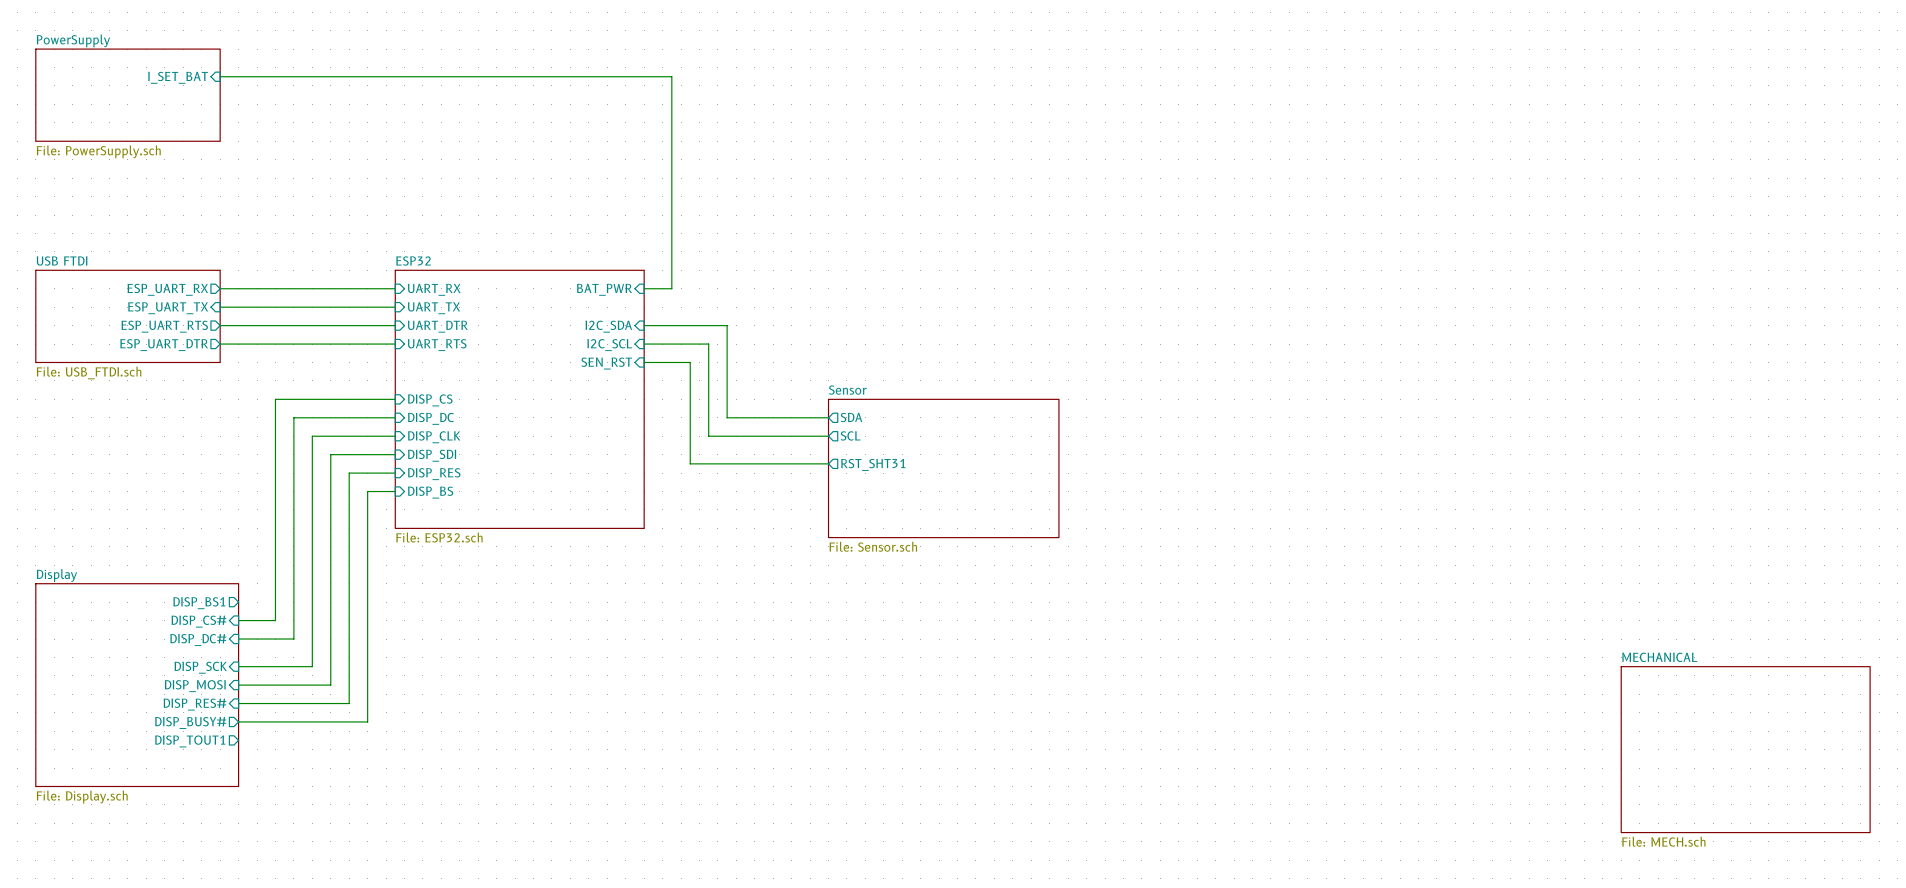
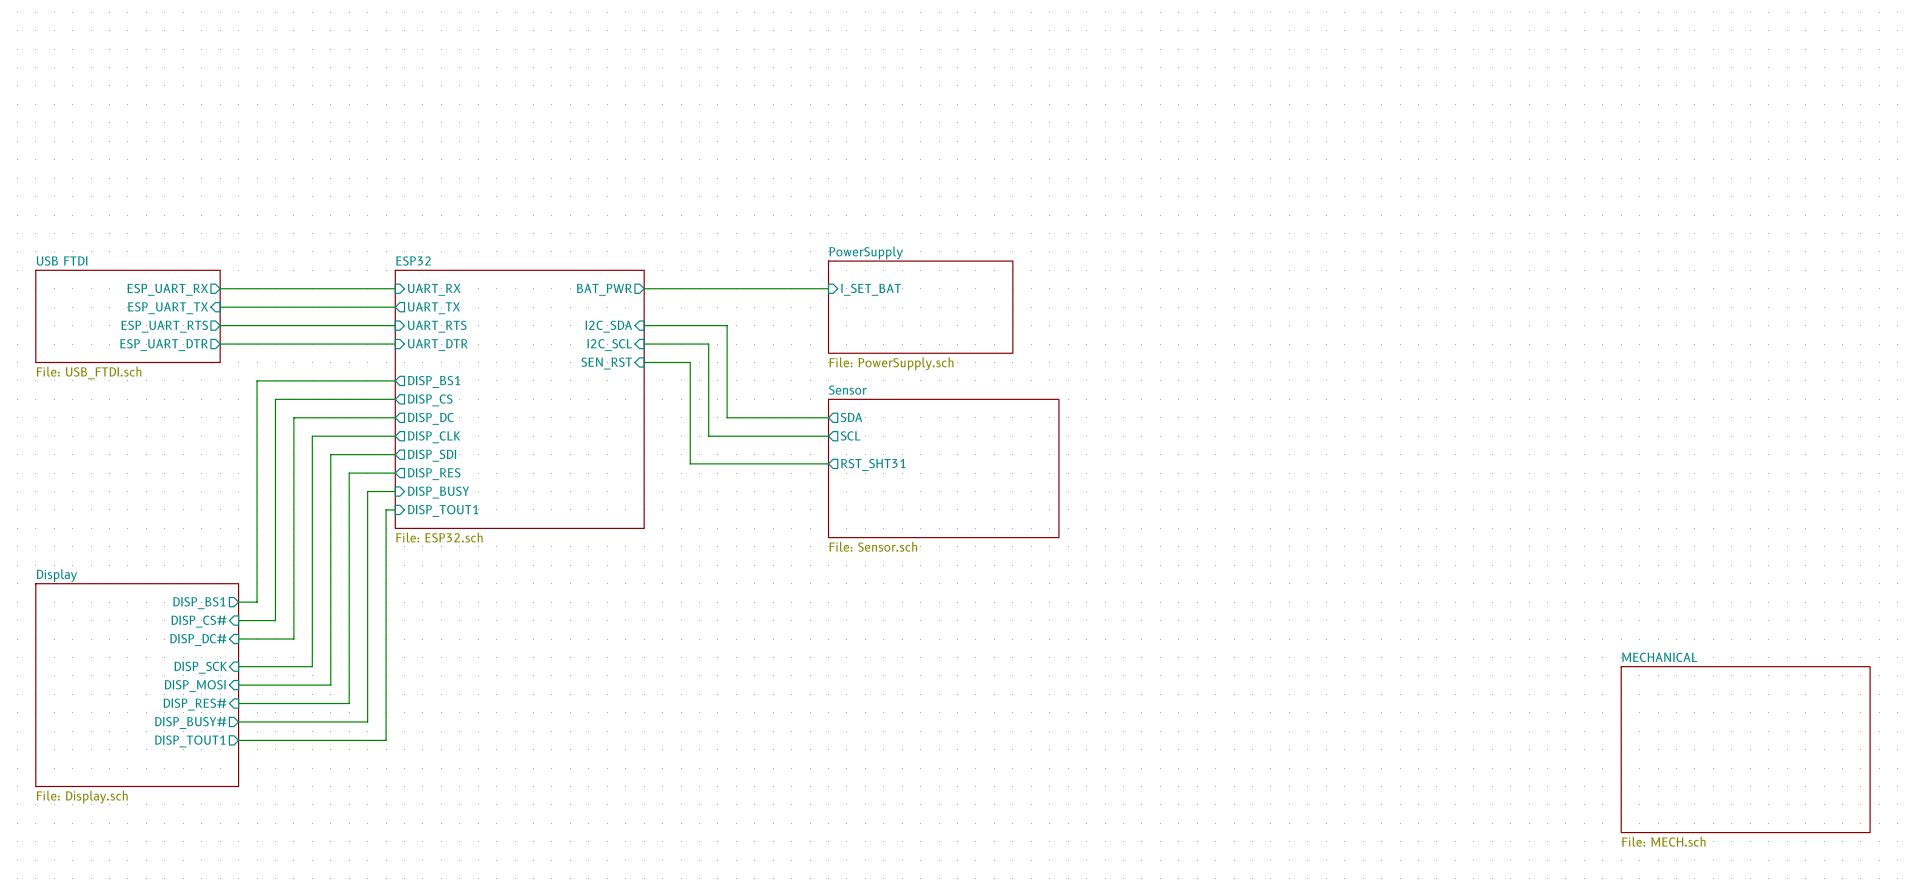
wire: (220, 76) (671, 76) (671, 288) -> (828, 288) (671, 288)
sheet pin: I_SET_BAT (178, 77) -> none
sheet PowerSupply: File: PowerSupply.sch (127, 95) -> none
sheet pin shape: input (604, 289) -> output (604, 289)
sheet pin: none -> I_SET_BAT (871, 289)
sheet PowerSupply: none -> File: PowerSupply.sch (920, 307)
sheet pin shape: input (433, 308) -> output (433, 308)
sheet pin: UART_DTR (437, 326) -> UART_RTS (437, 326)
sheet pin: UART_RTS (437, 345) -> UART_DTR (437, 345)
wire: none -> (395, 380) (257, 380) (257, 602) (238, 602)
sheet pin: none -> DISP_BS1 (434, 381)
sheet pin shape: input (430, 400) -> output (430, 400)
sheet pin shape: input (430, 418) -> output (430, 418)
sheet pin shape: input (434, 437) -> output (434, 437)
sheet pin shape: input (432, 455) -> output (432, 455)
sheet pin shape: input (434, 474) -> output (434, 474)
sheet pin: DISP_BS (430, 492) -> DISP_BUSY (438, 492)
wire: none -> (395, 509) (386, 509) (386, 740) (238, 740)
sheet pin: none -> DISP_TOUT1 (443, 510)

